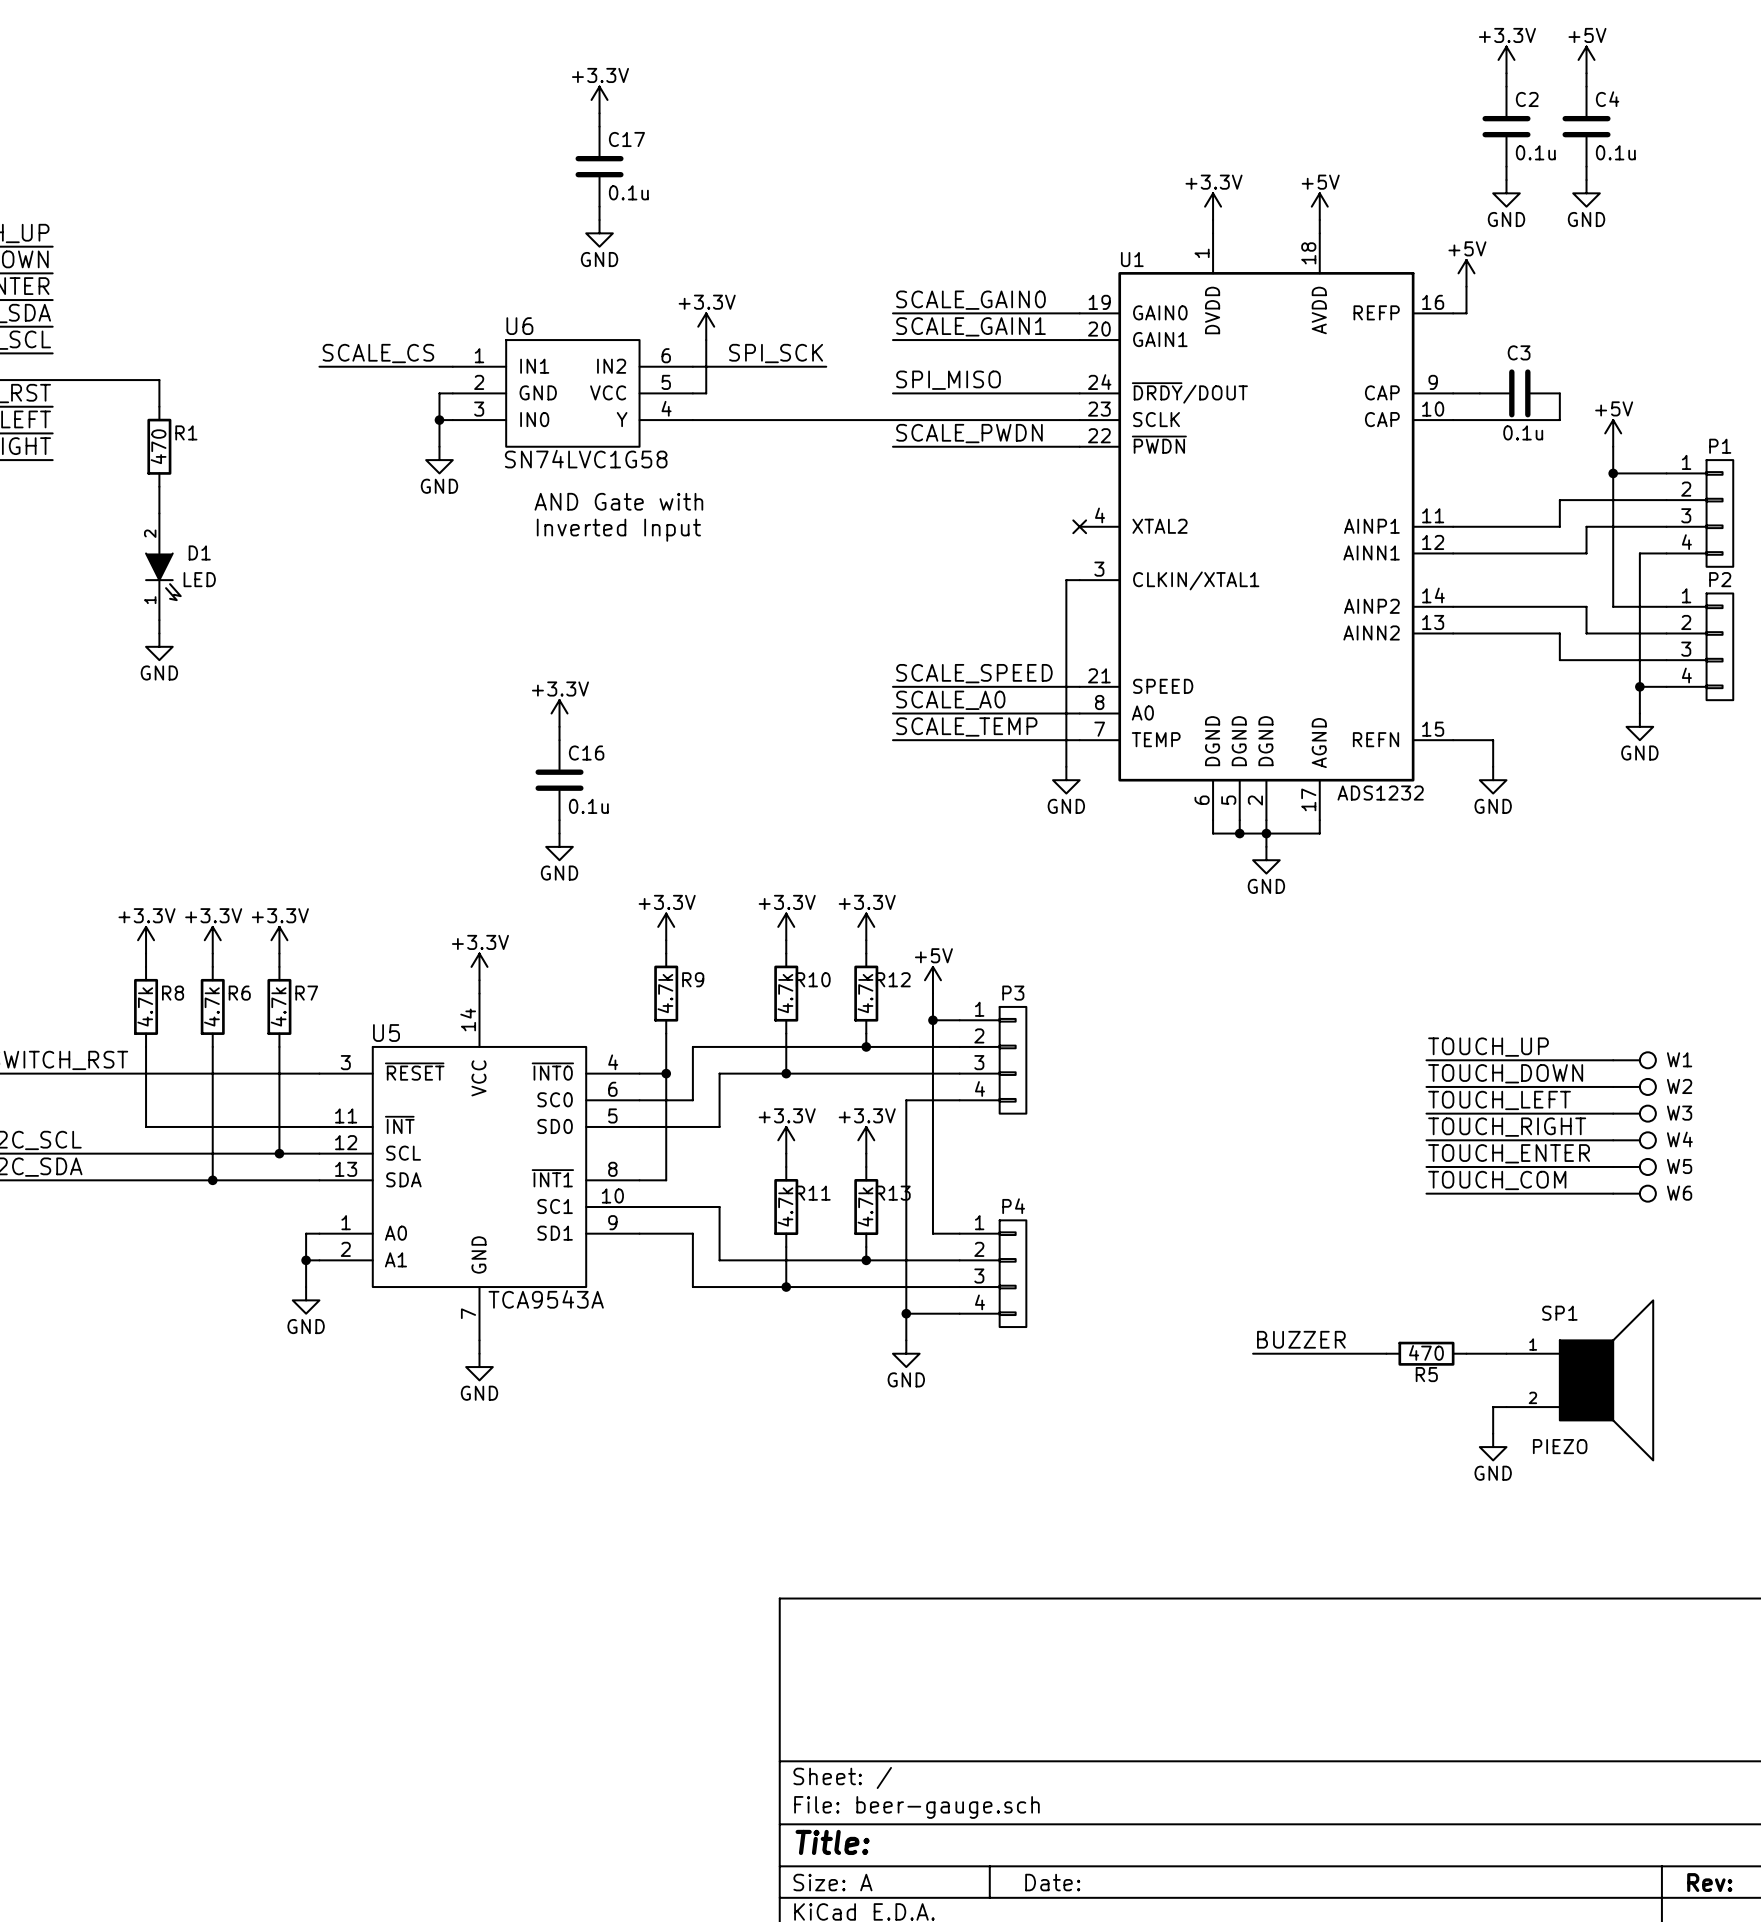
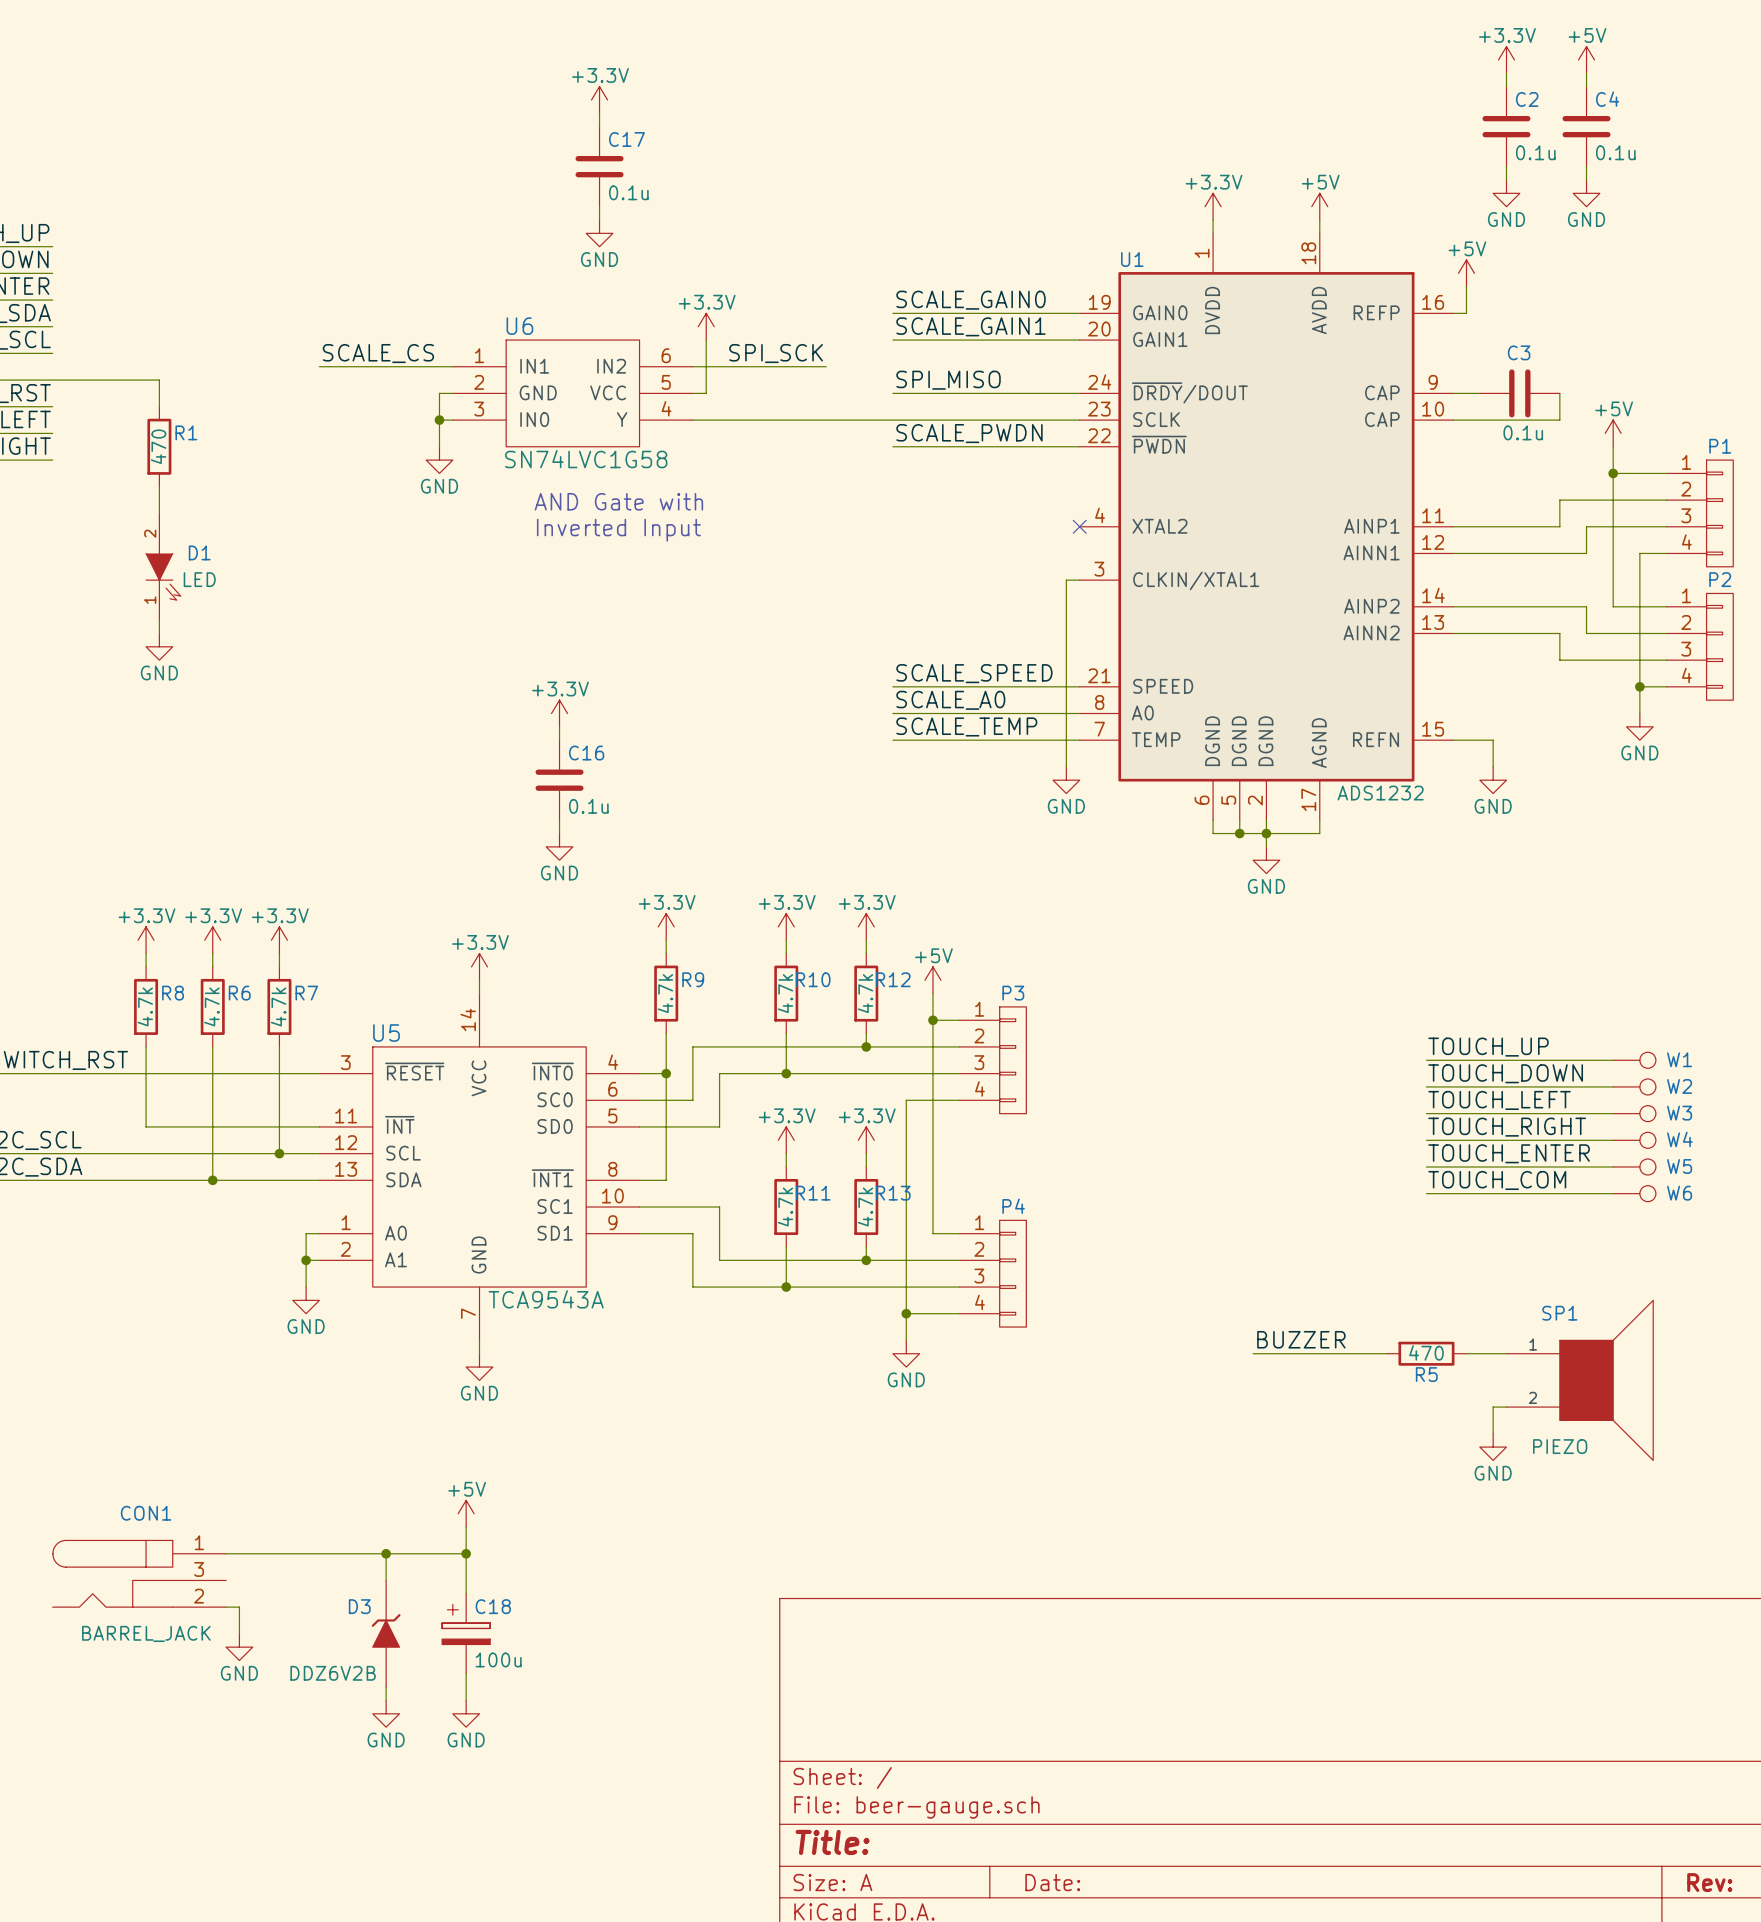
power symbol: none -> +5V (466, 1513)
wire: none -> (466, 1527) (466, 1593)
wire: none -> (226, 1553) (466, 1553)
wire: none -> (386, 1553) (386, 1580)
junction: none -> (386, 1553)
junction: none -> (466, 1553)
CON1: none -> BARREL_JACK (139, 1573)
wire: none -> (226, 1607) (239, 1607) (239, 1633)
D3: none -> DDZ6V2B (386, 1633)
C18: none -> 100u (466, 1633)
power symbol: none -> GND (239, 1647)
wire: none -> (466, 1673) (466, 1700)
wire: none -> (386, 1687) (386, 1700)
power symbol: none -> GND (386, 1713)
power symbol: none -> GND (466, 1713)

